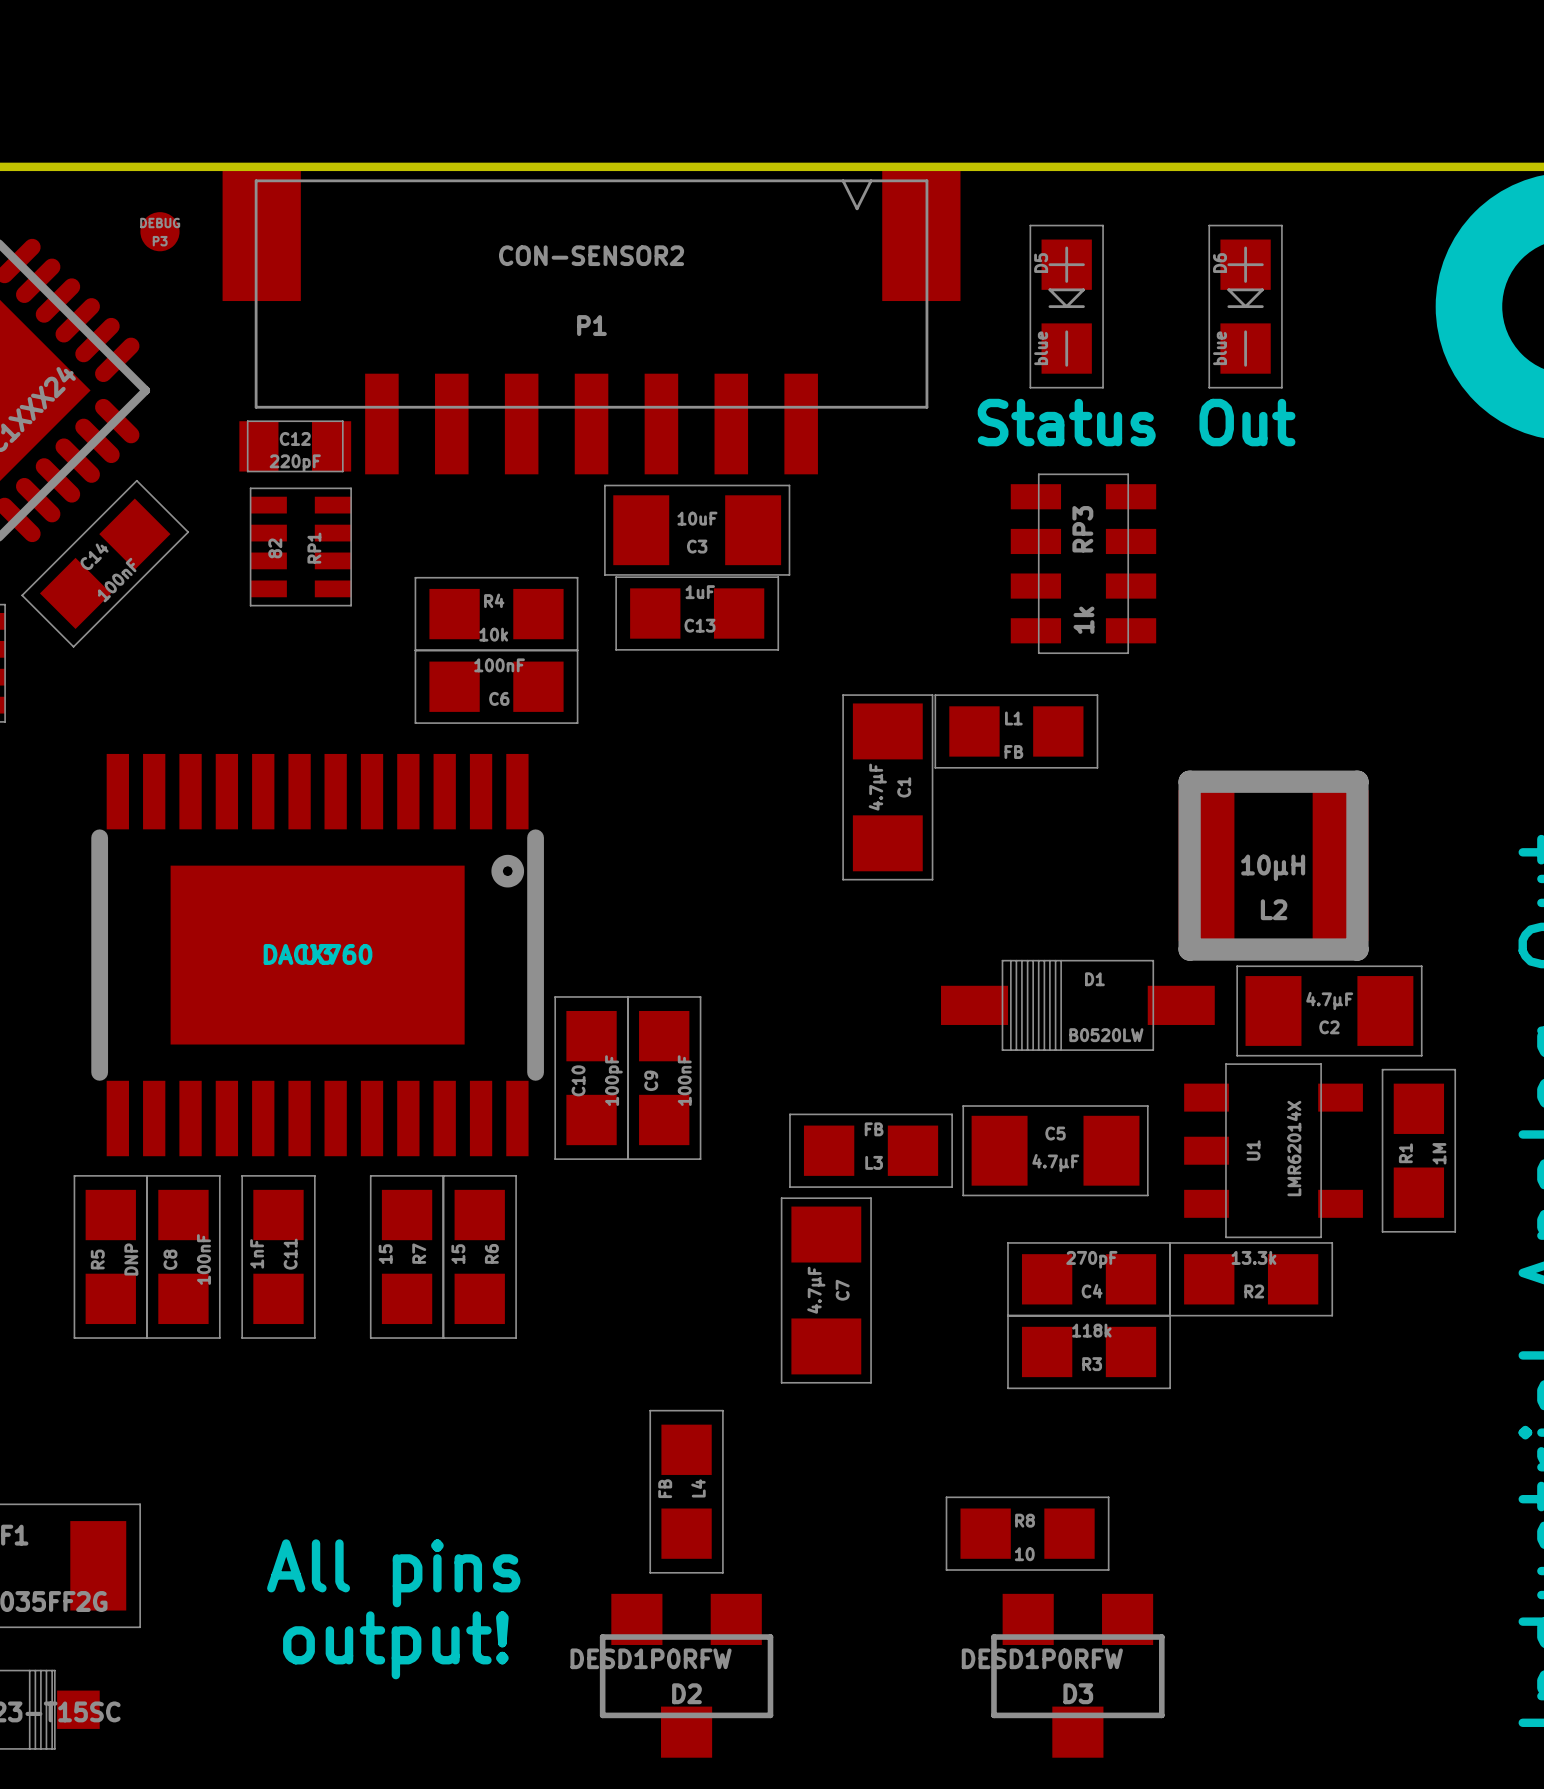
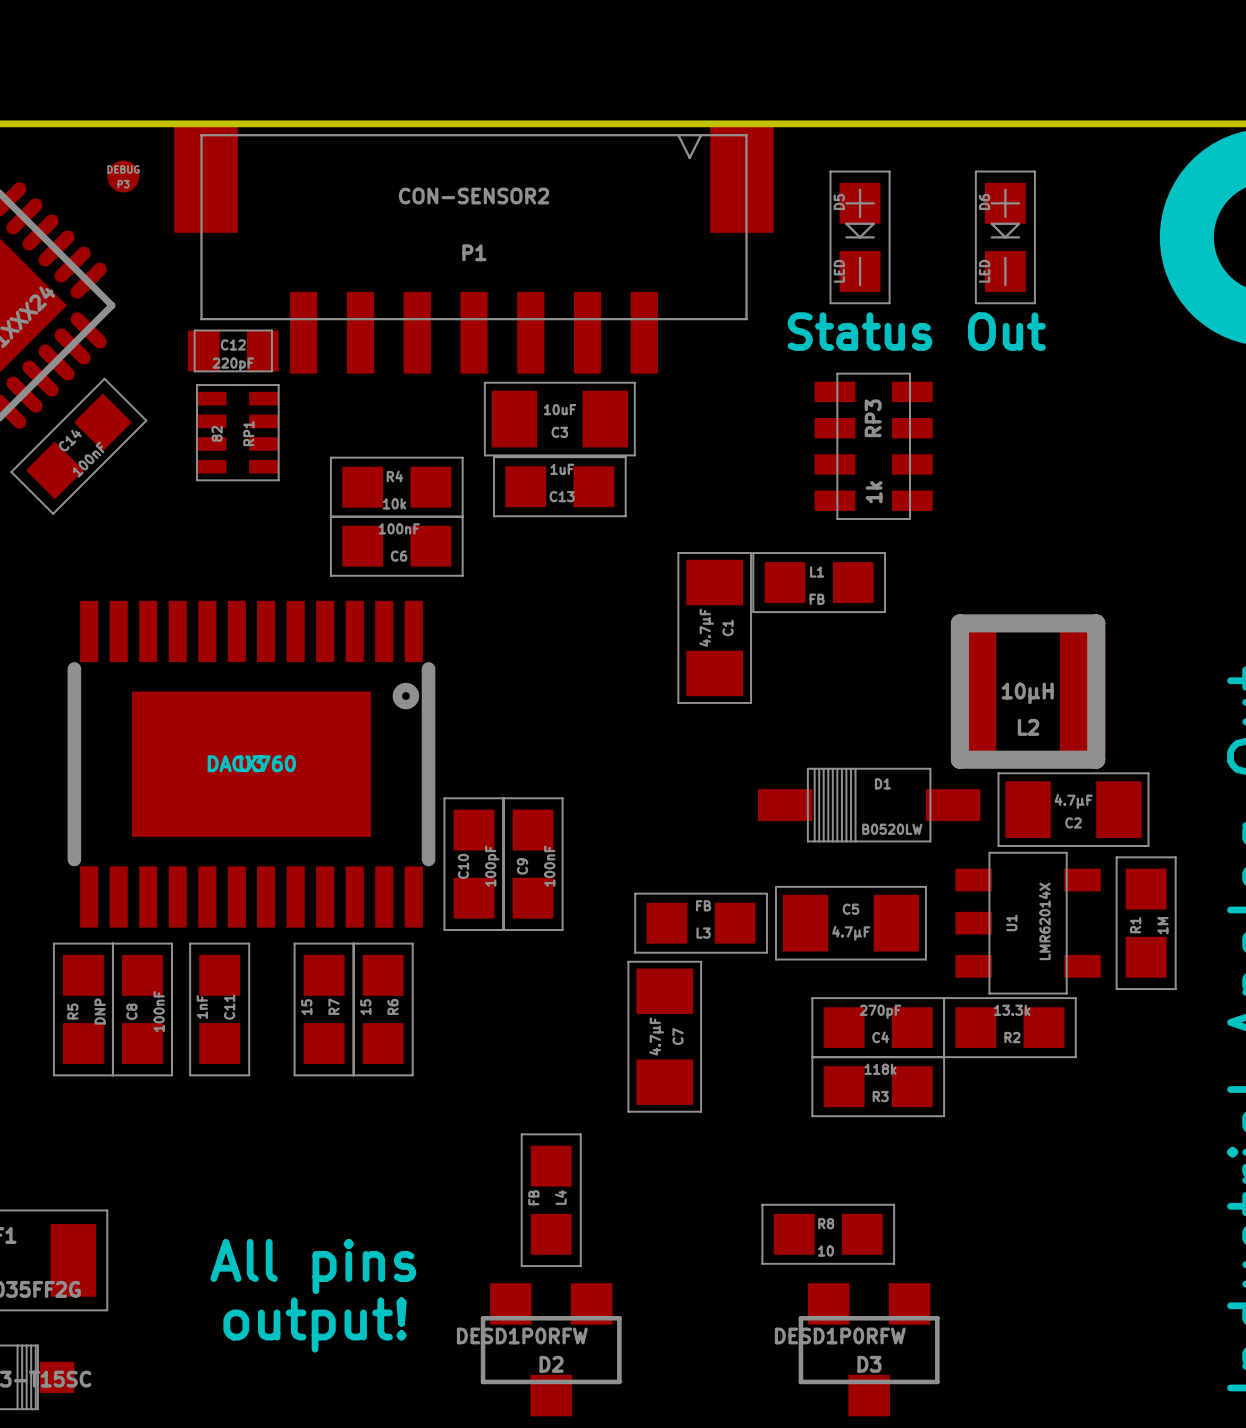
D5 value: blue (1041, 348) -> LED (839, 271)
D6 value: blue (1220, 348) -> LED (984, 271)

